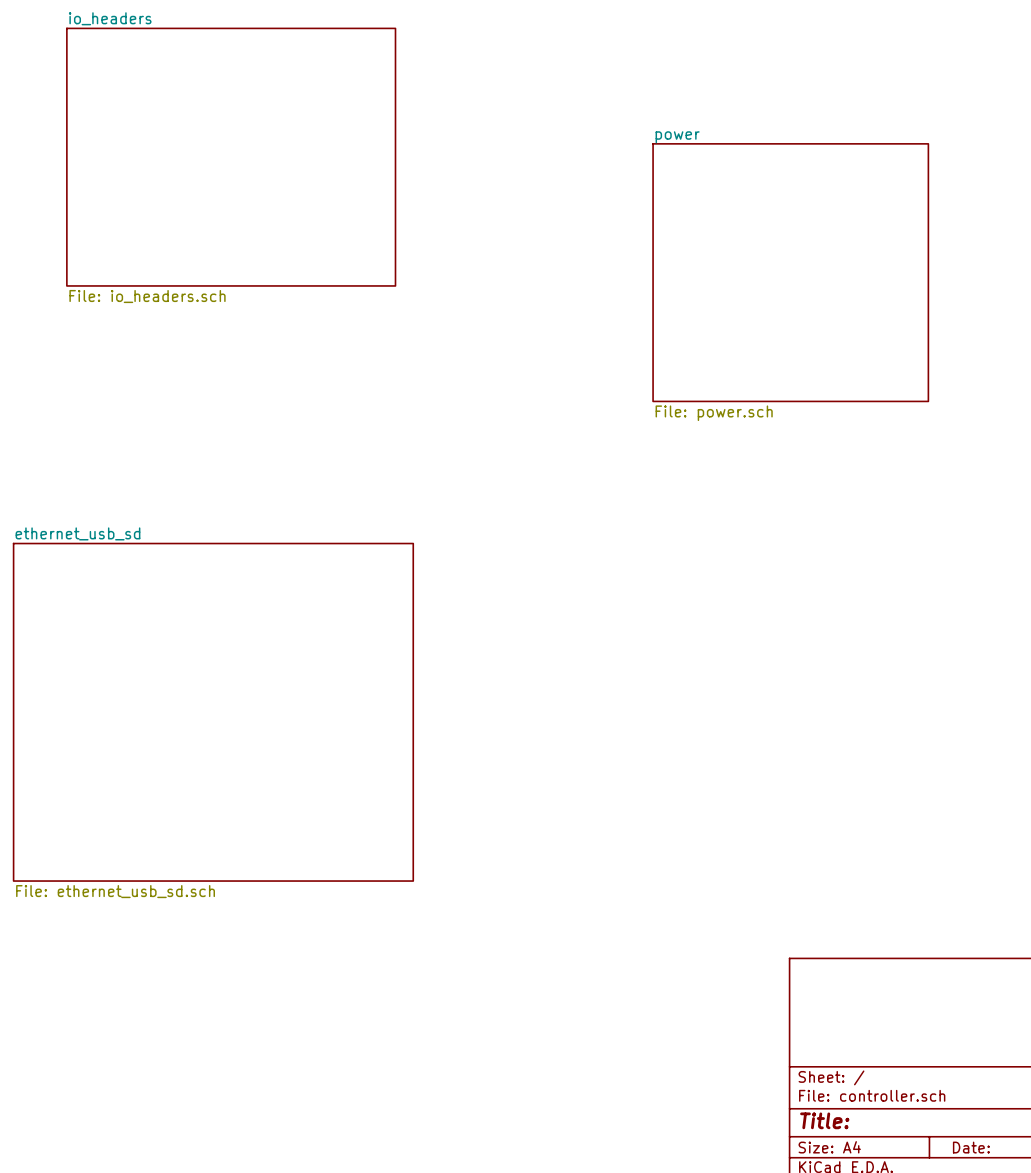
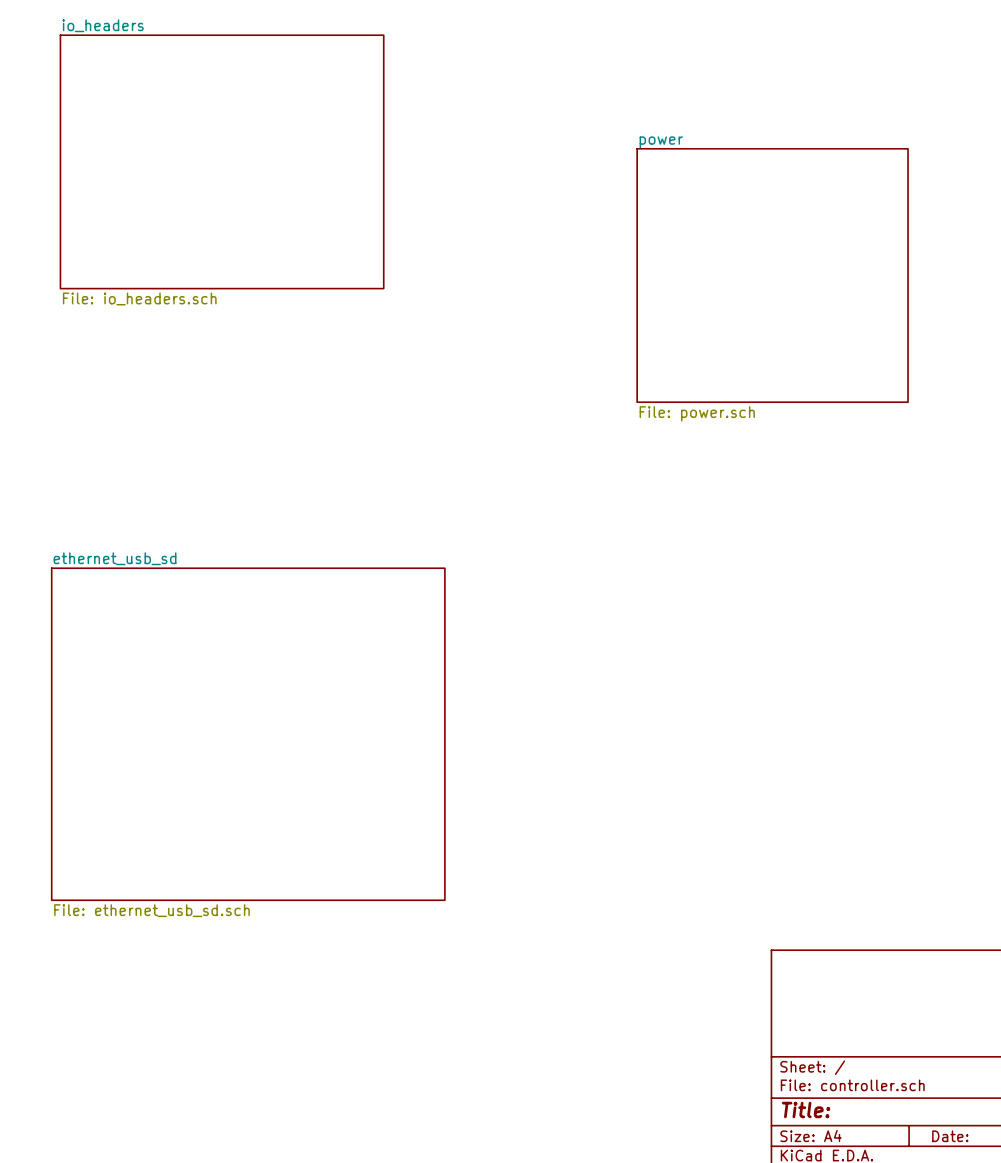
sheet ethernet_usb_sd position: (213, 712) -> (248, 734)

